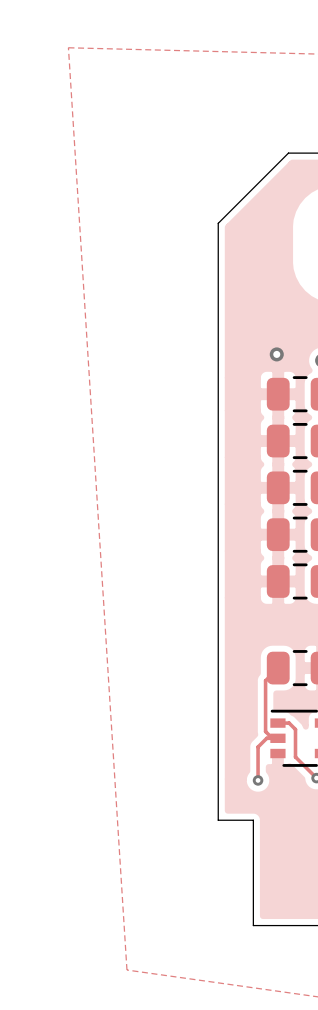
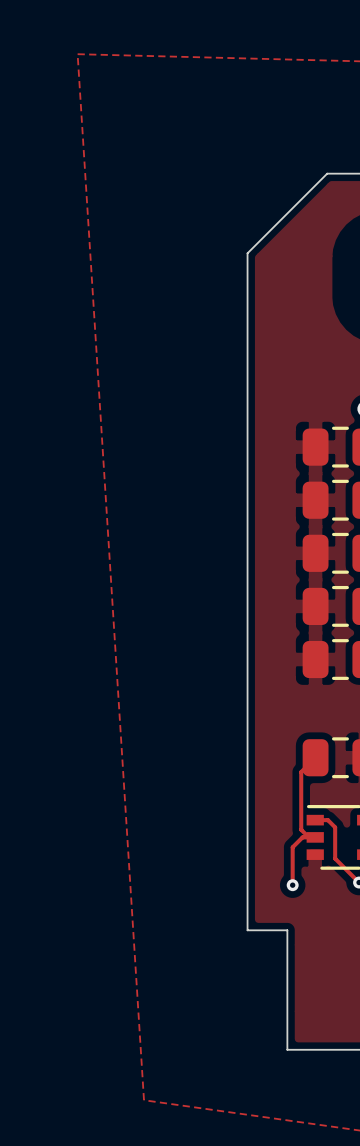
via: (276, 354) -> none

